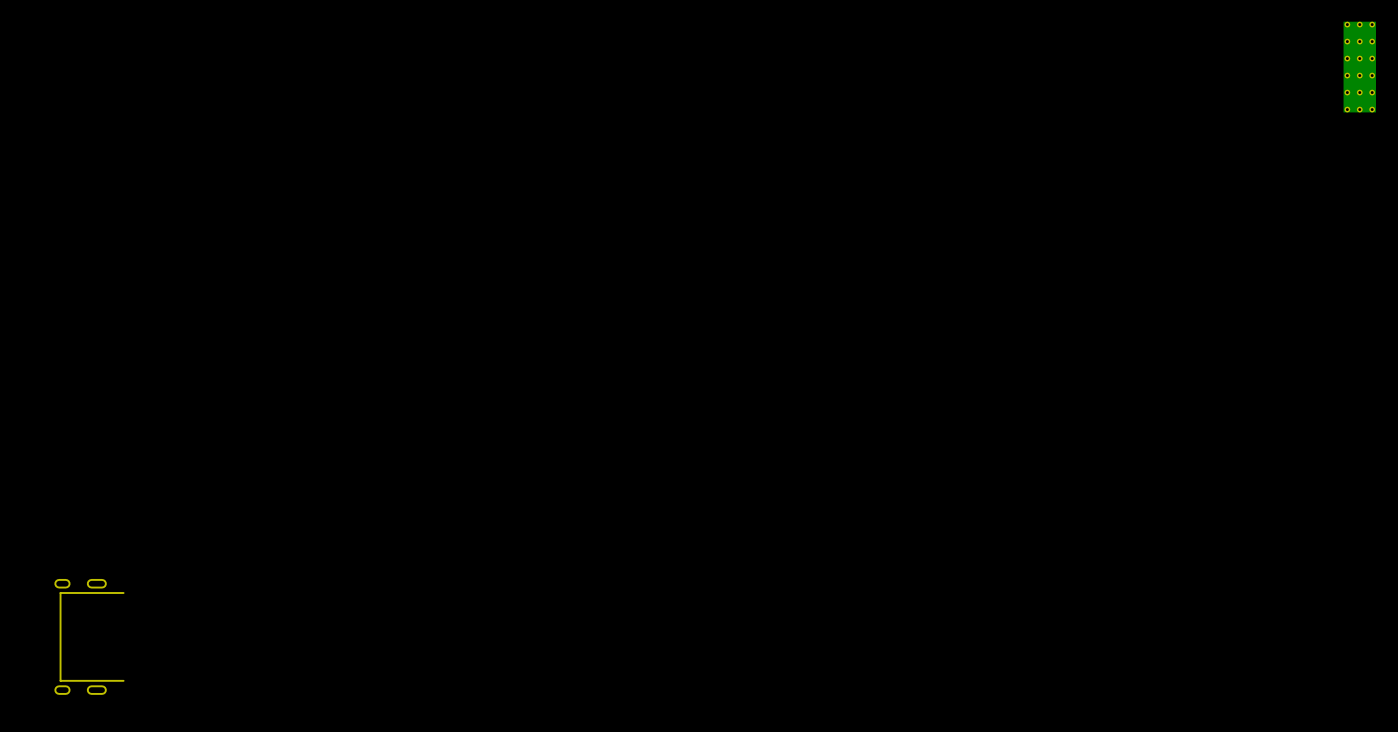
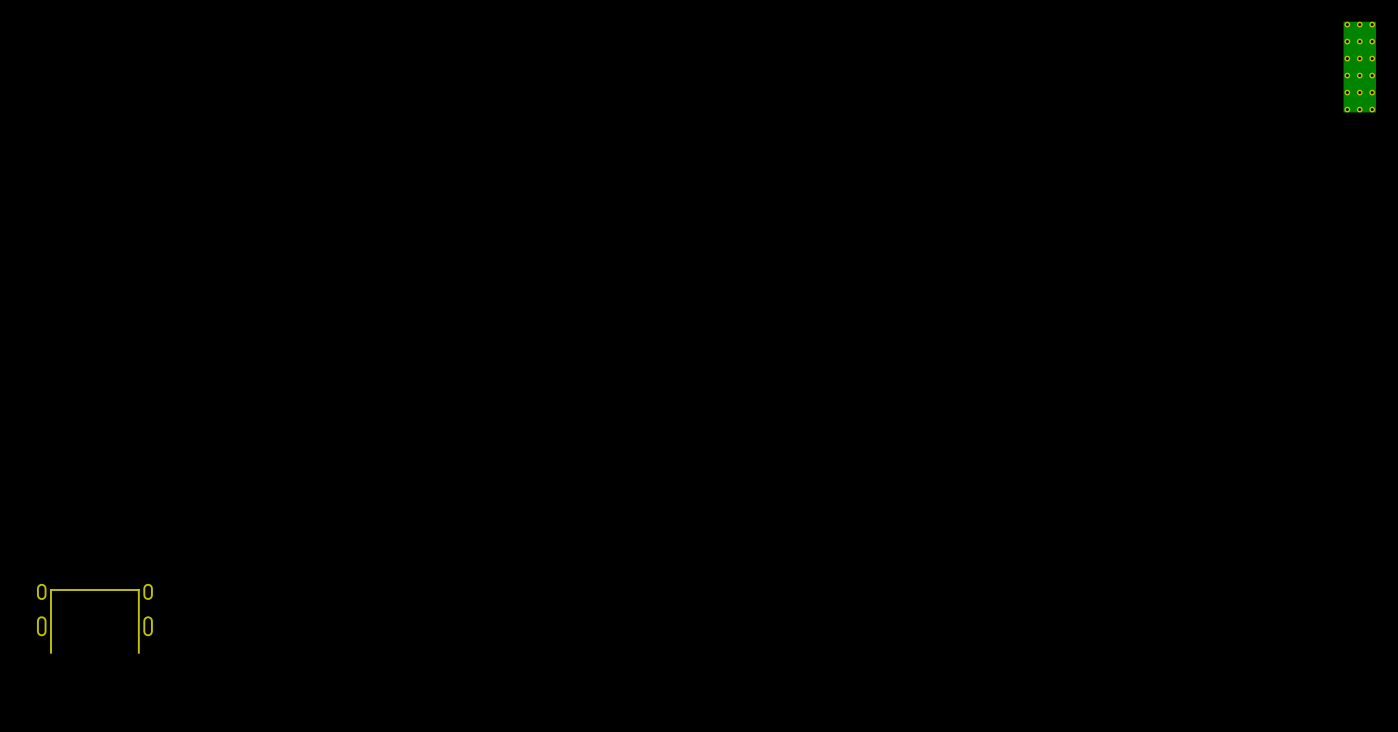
part rotation: 0° (89, 636) -> 90° clockwise (94, 618)

